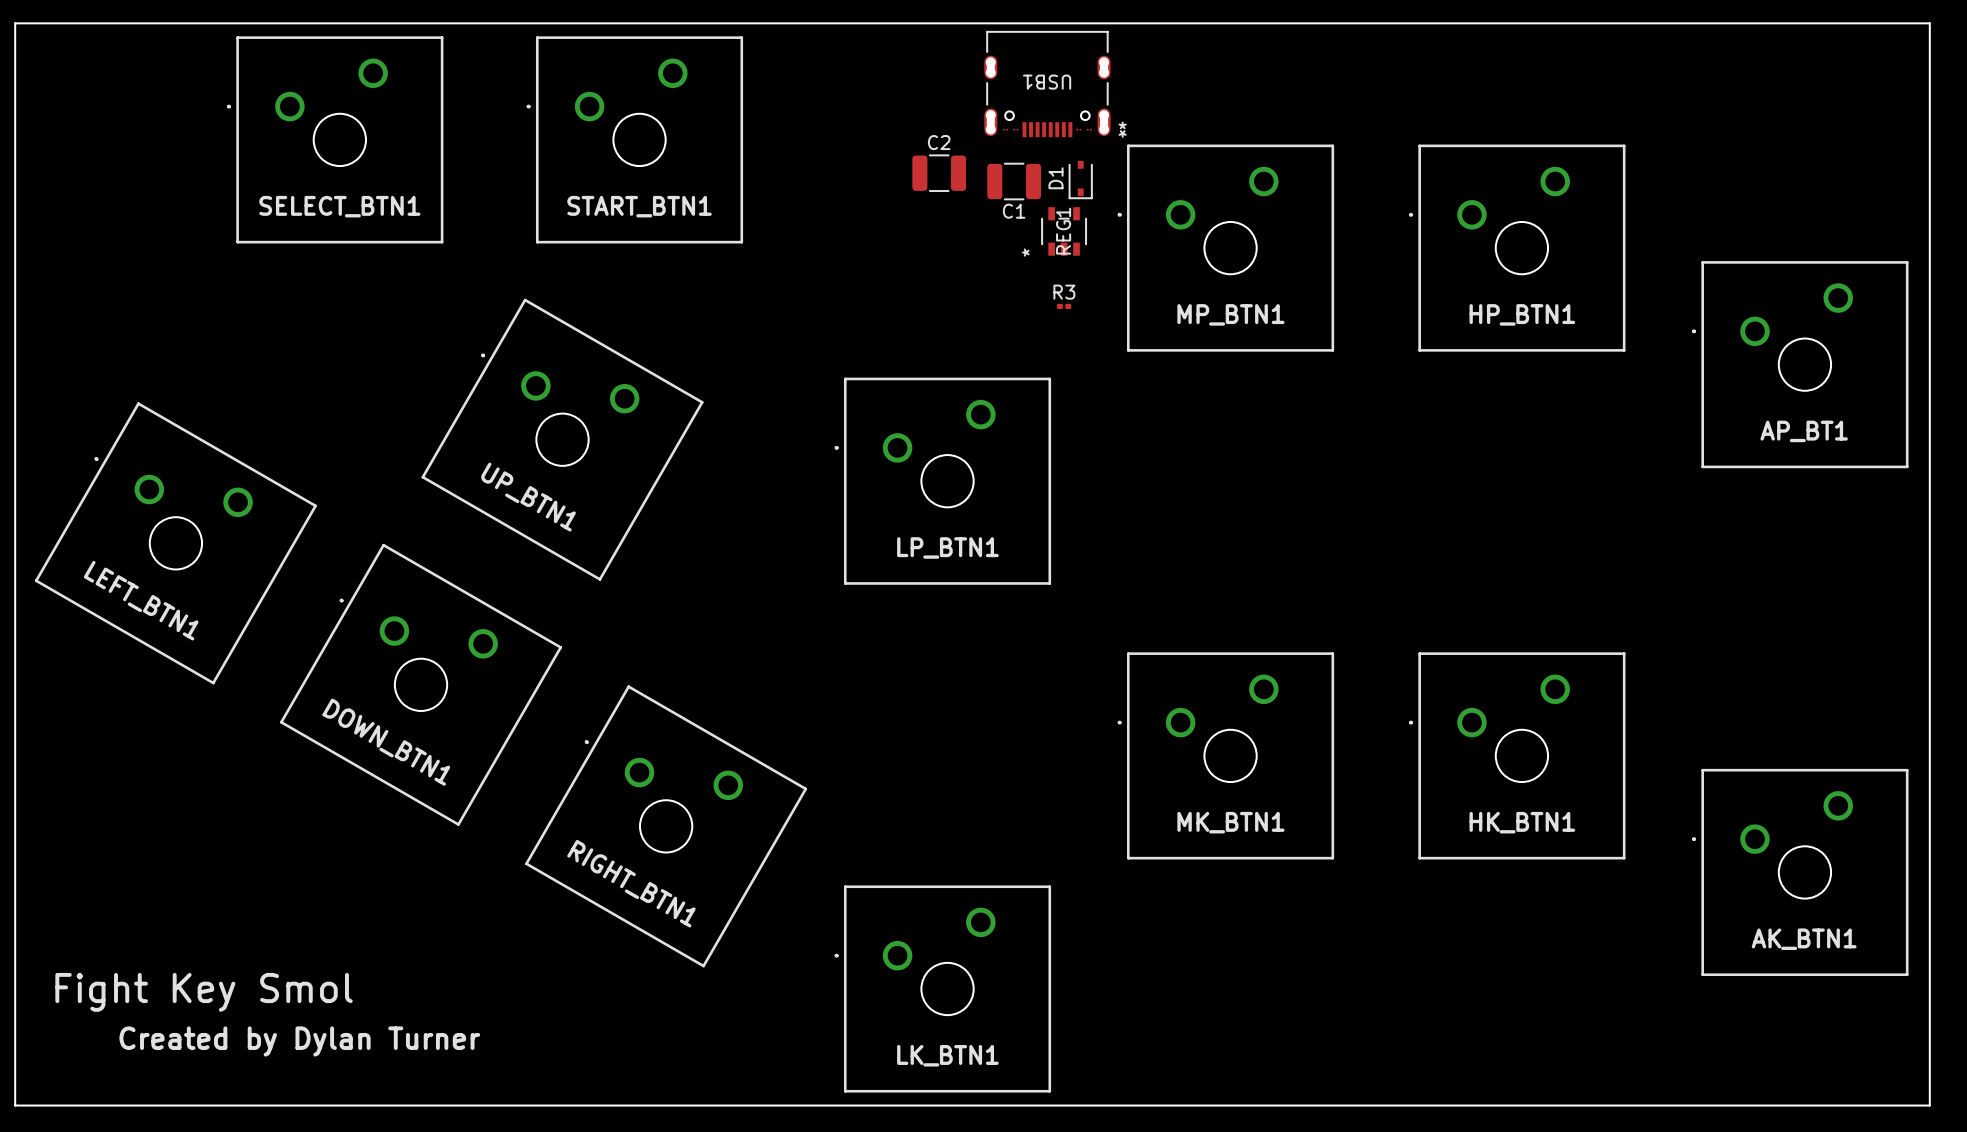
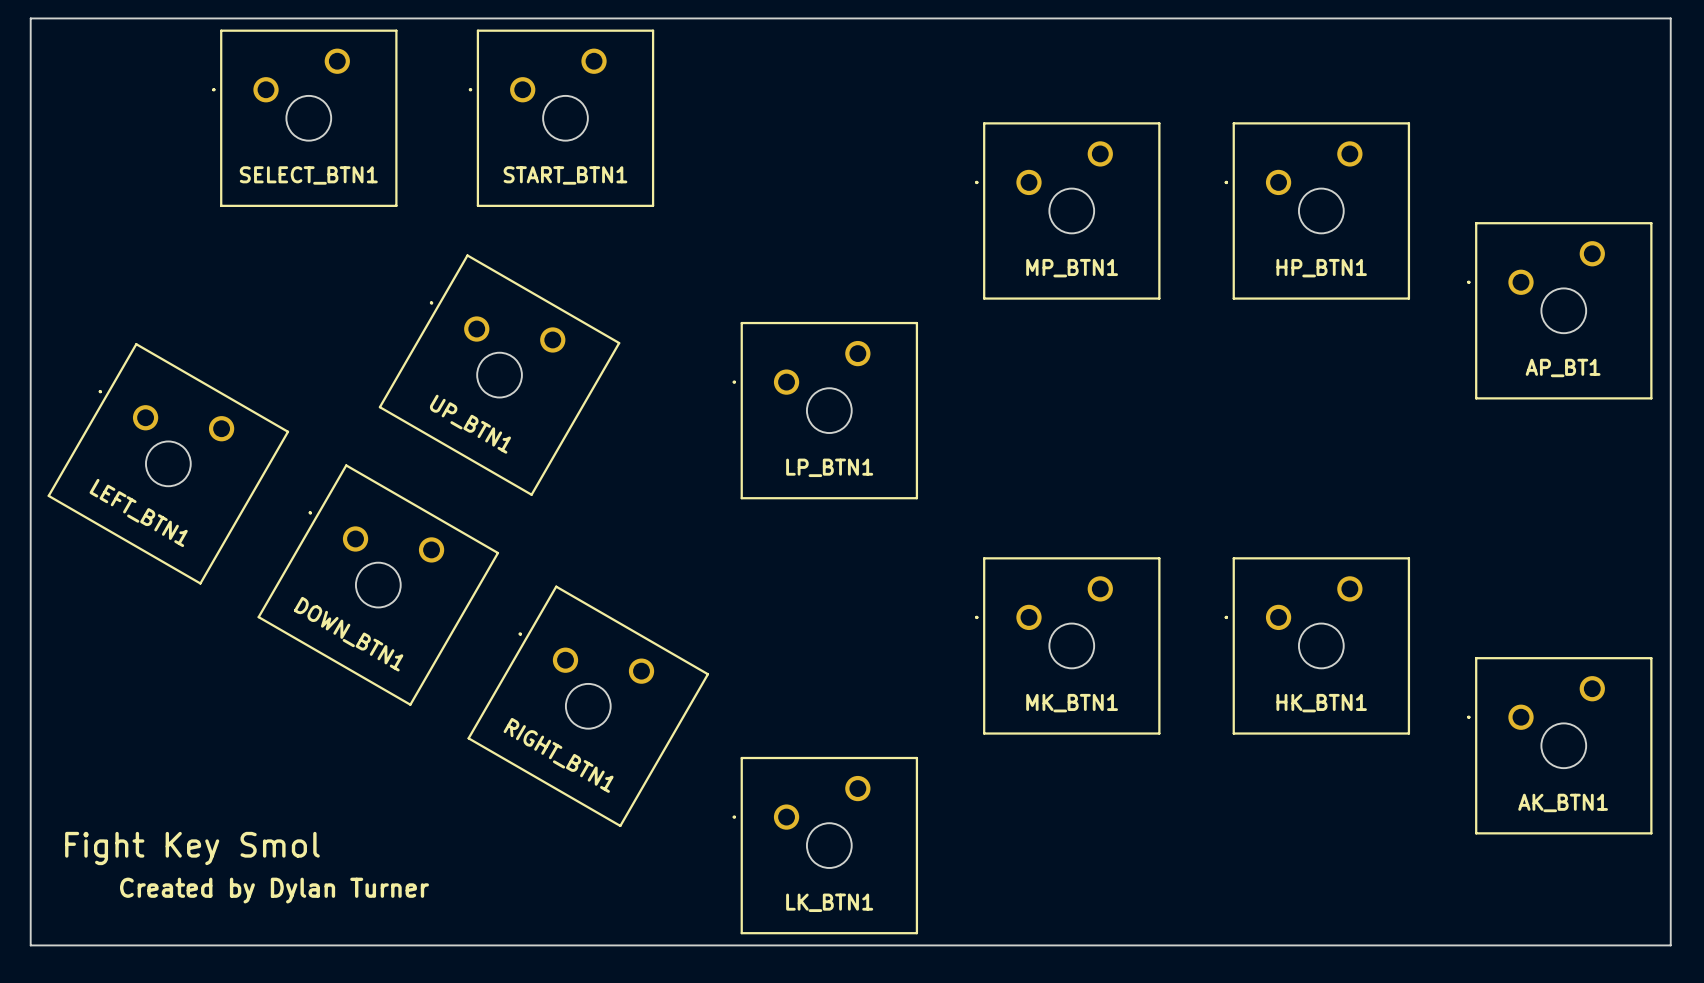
USB1: (1047, 84) -> none
C2: (939, 173) -> none
D1: (1080, 179) -> none
C1: (1014, 181) -> none
REG1: (1064, 231) -> none
R3: (1064, 306) -> none

